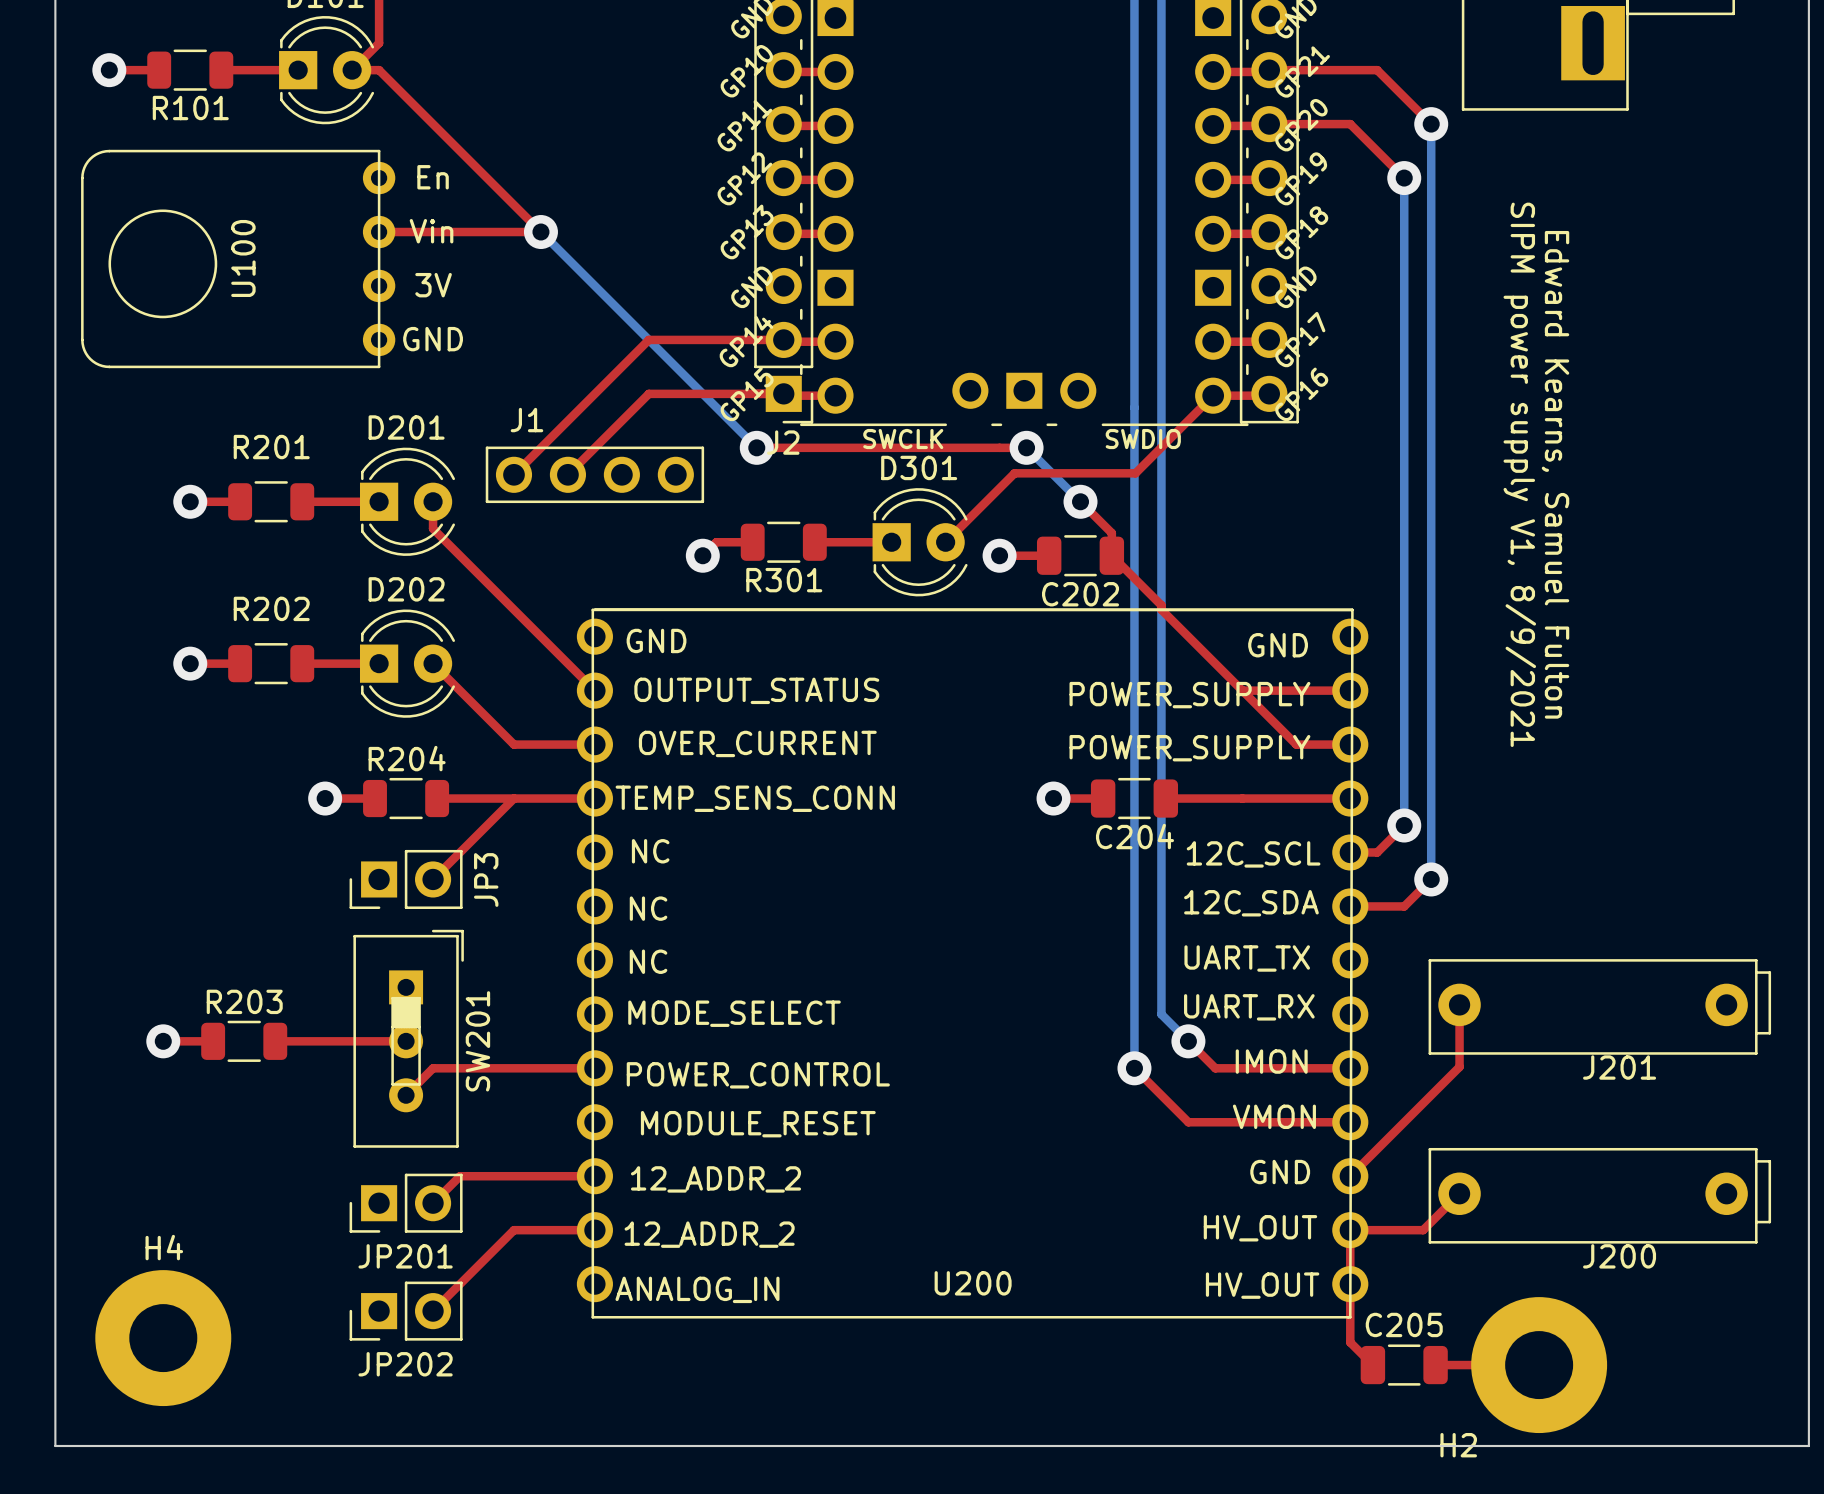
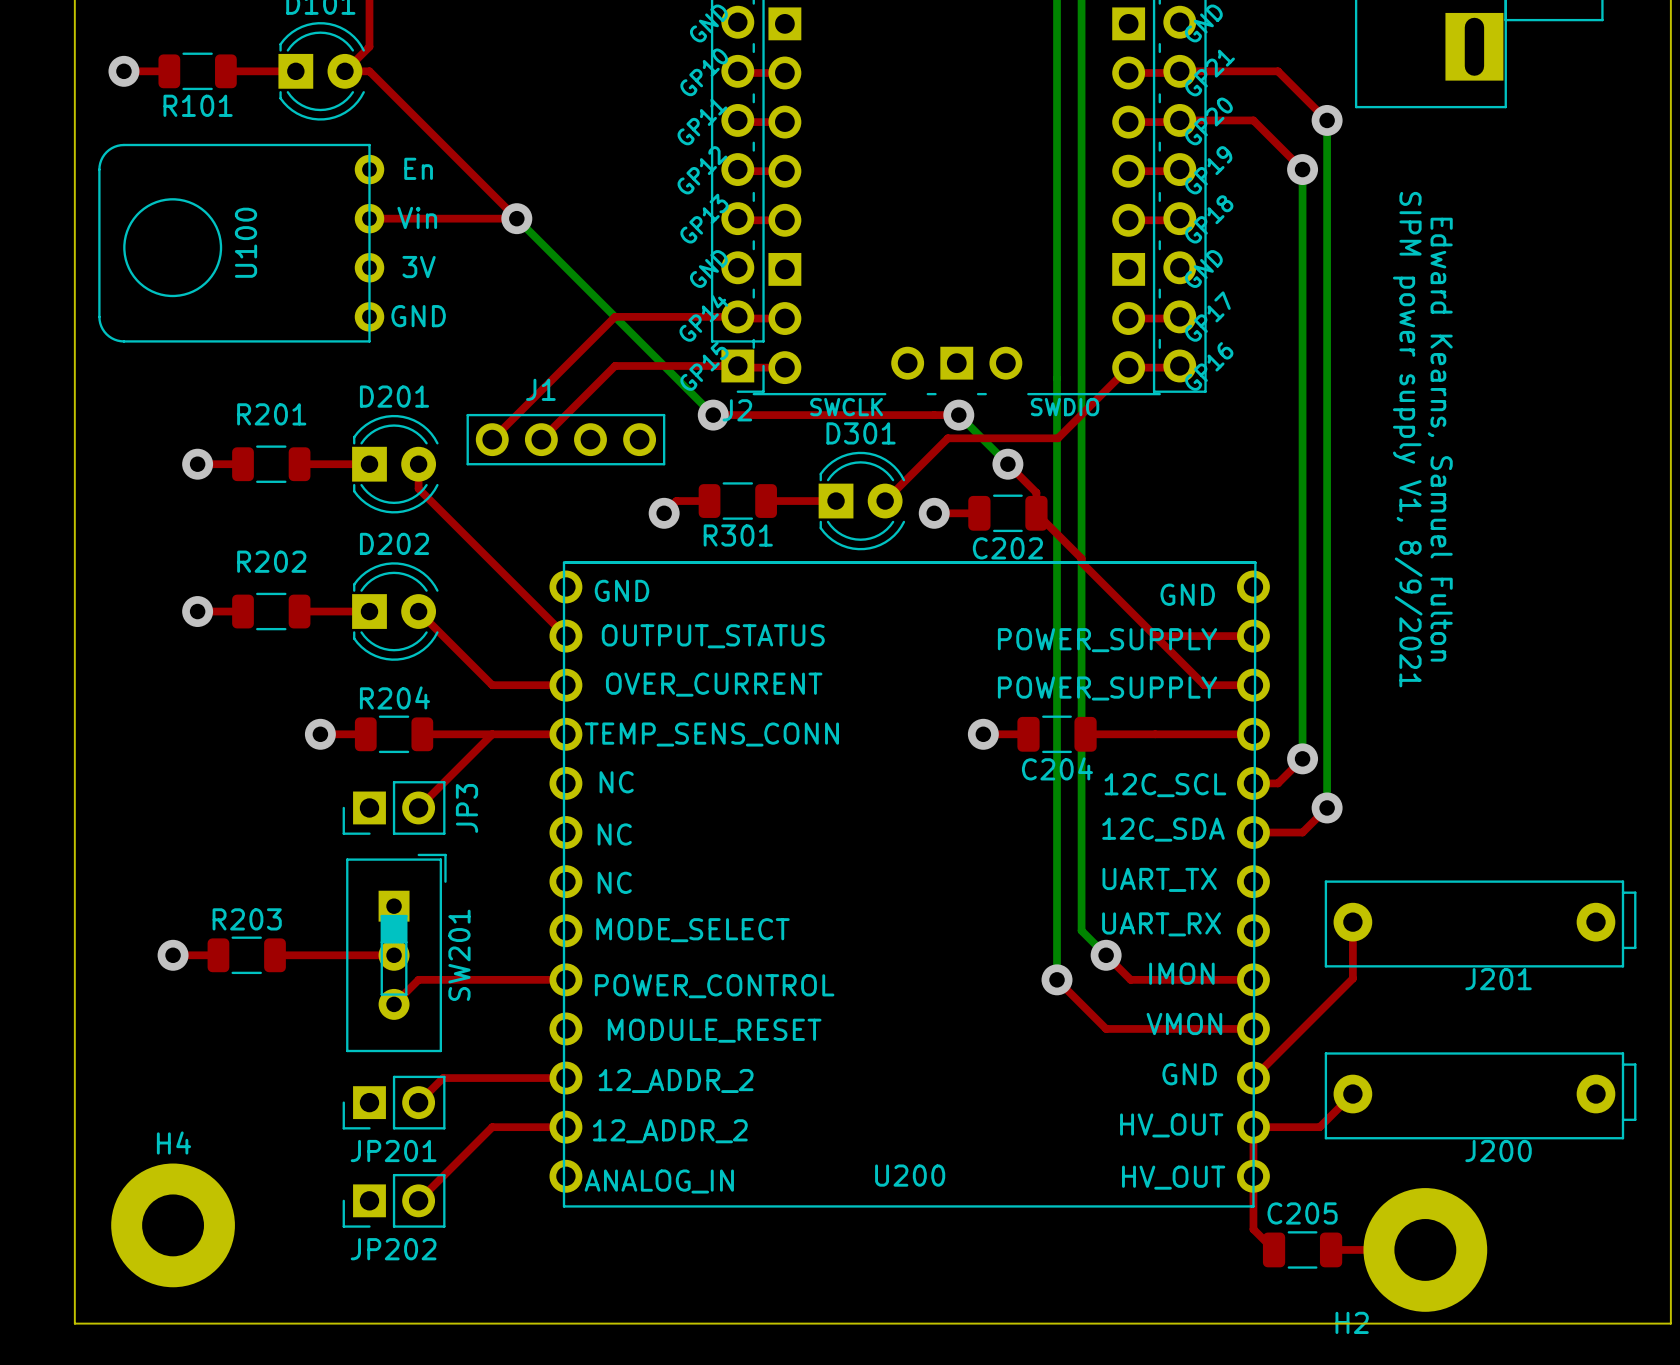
J1 name position: J1 (526, 420) -> J1 (540, 389)

